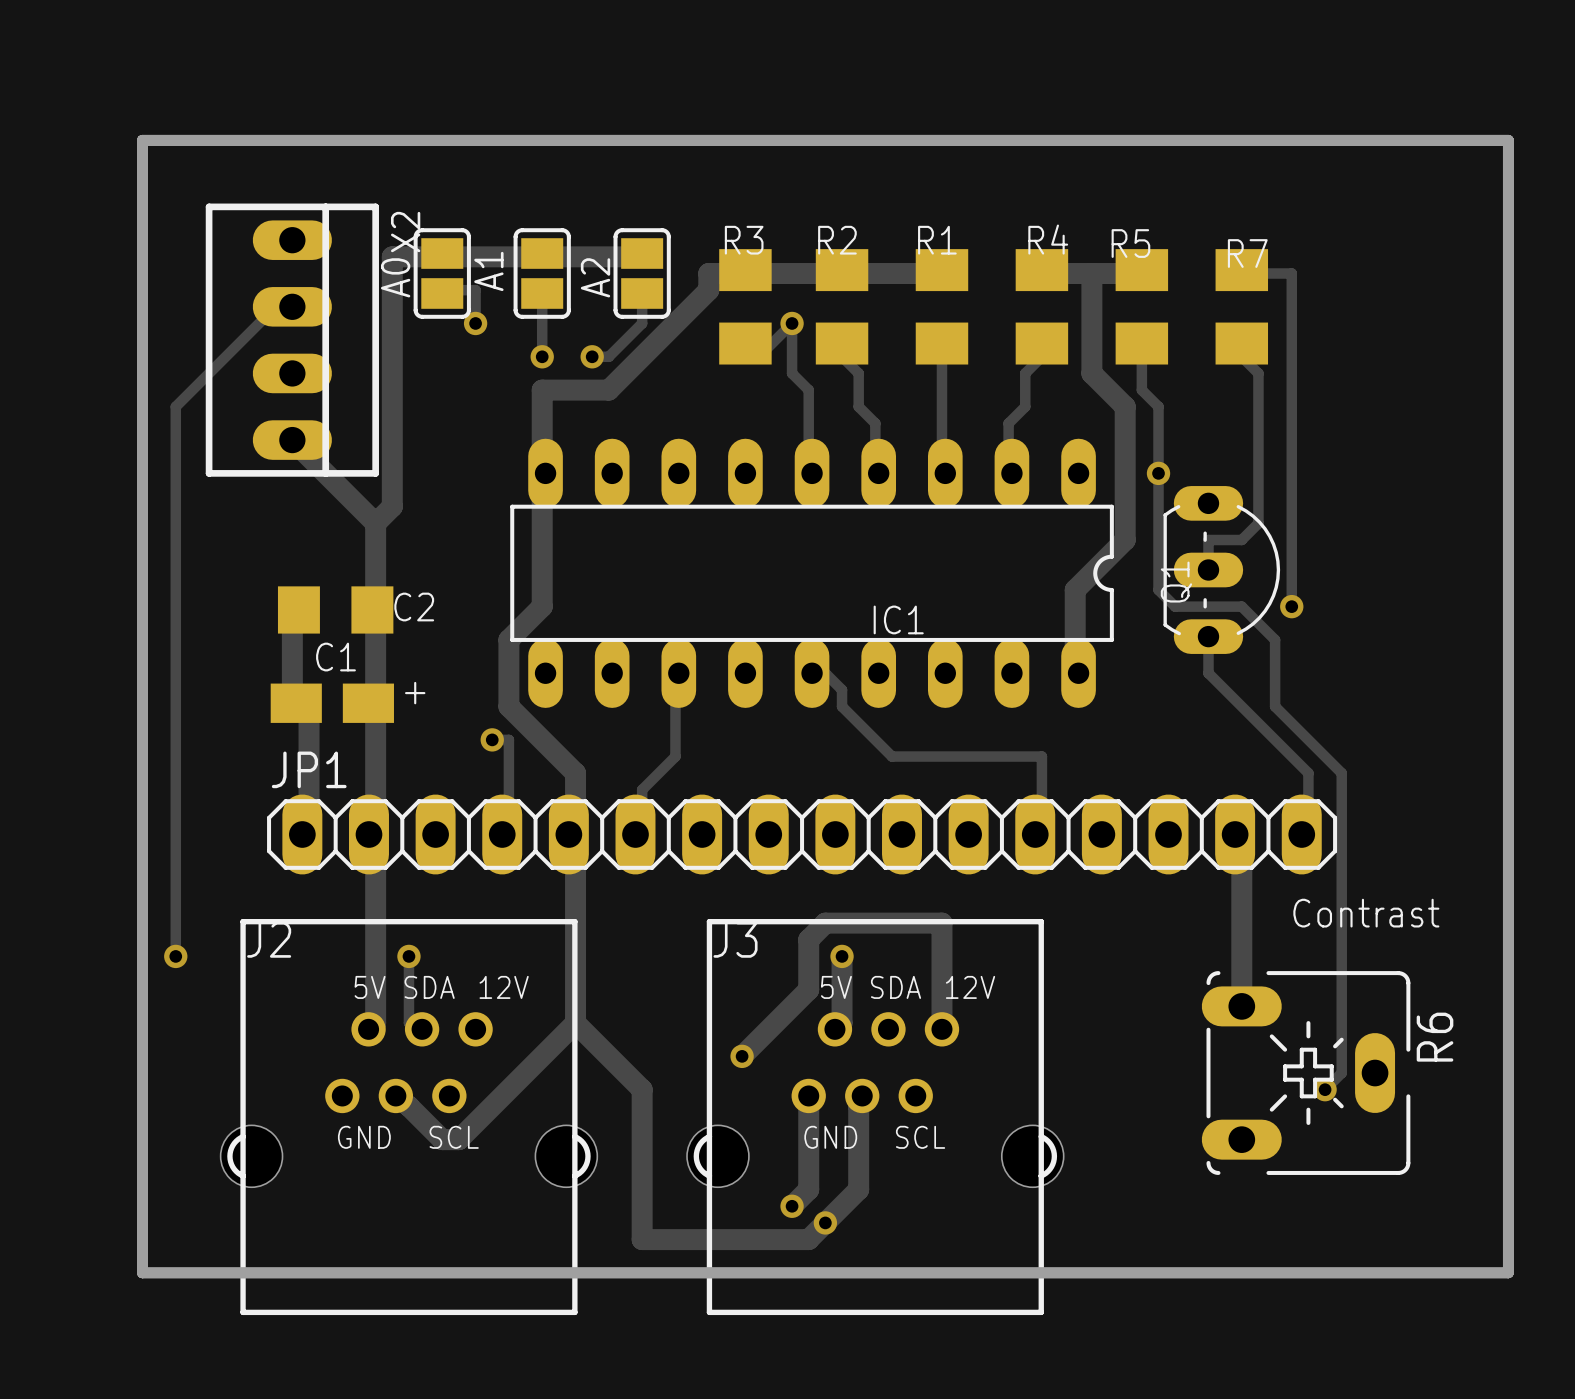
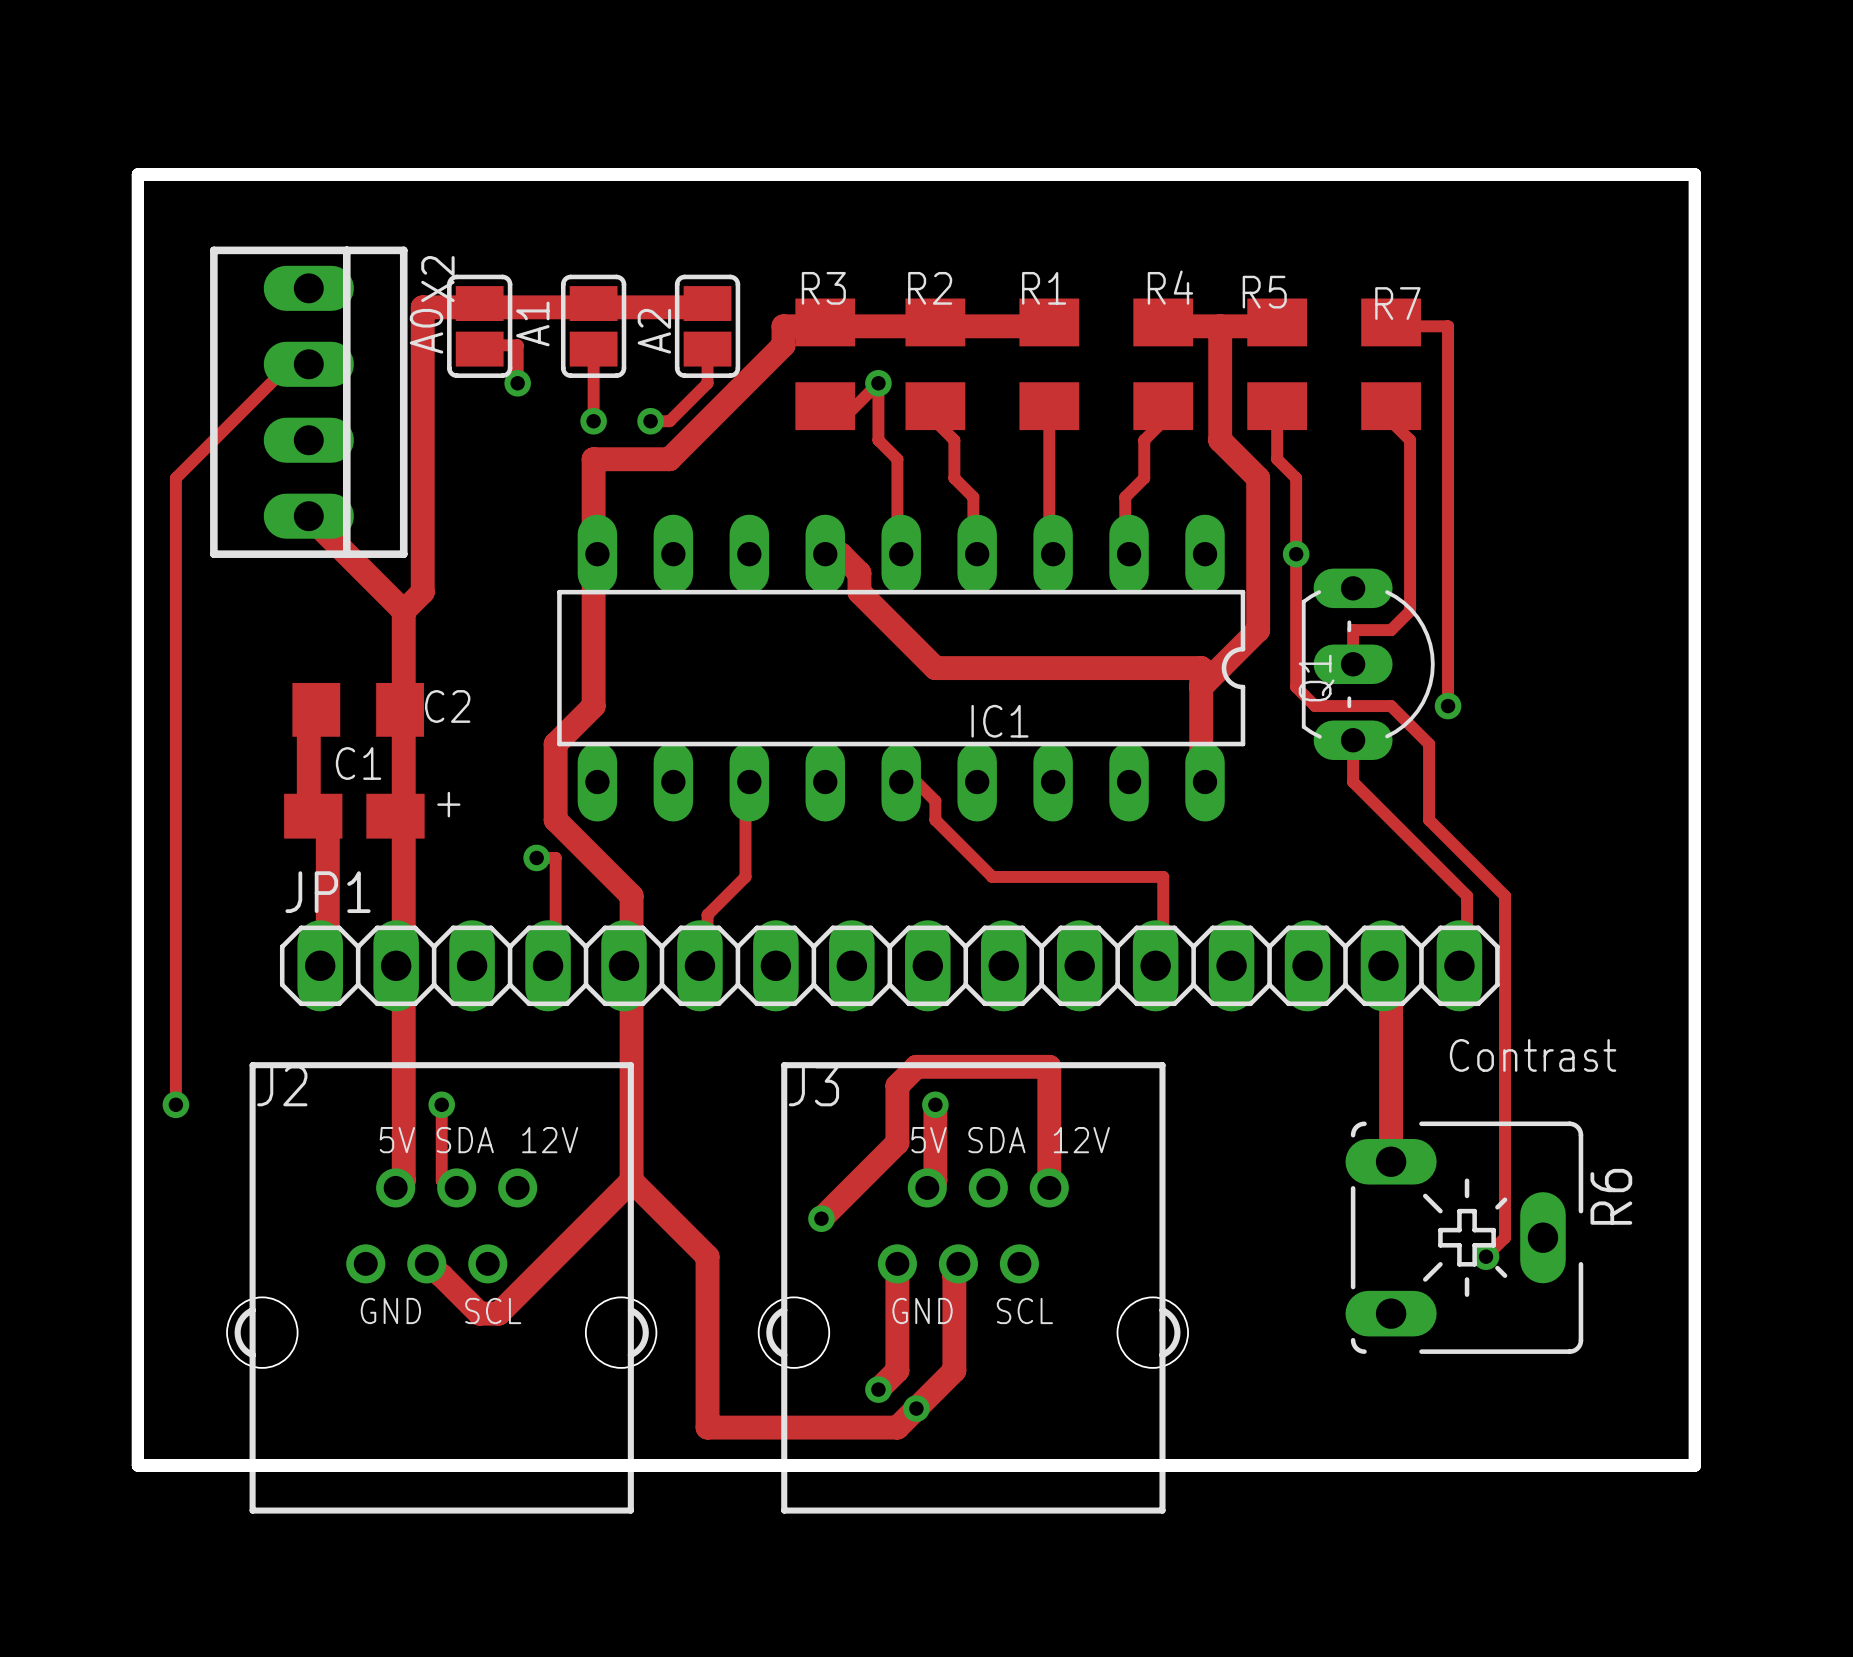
track: none -> (825, 554) (840, 554) (859, 573) (859, 592) (935, 668) (1201, 668) (1201, 687)

